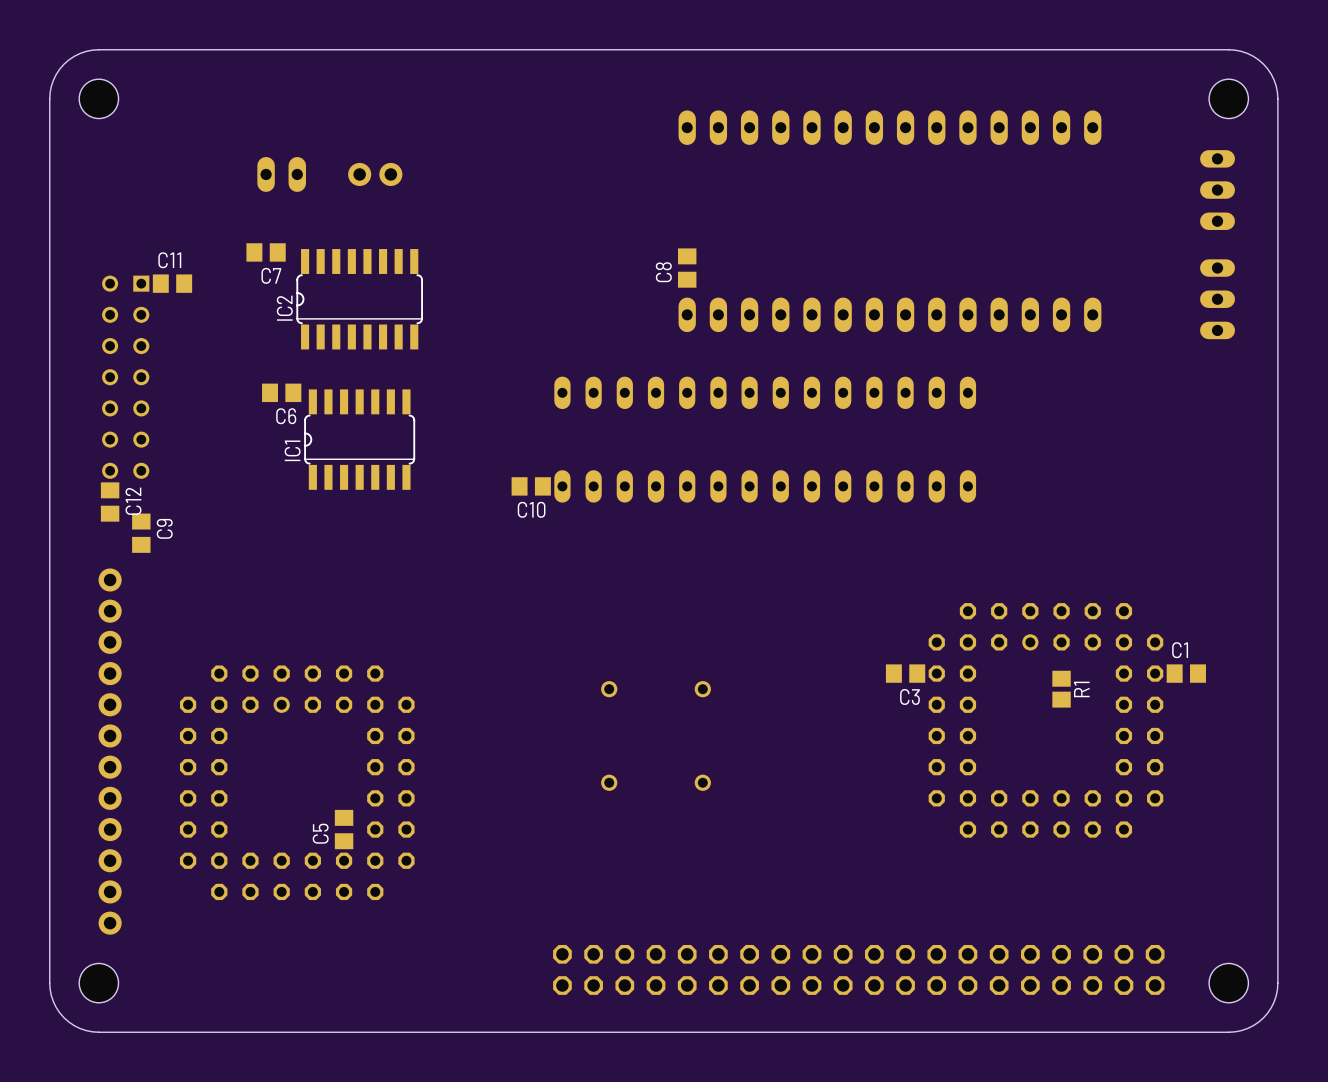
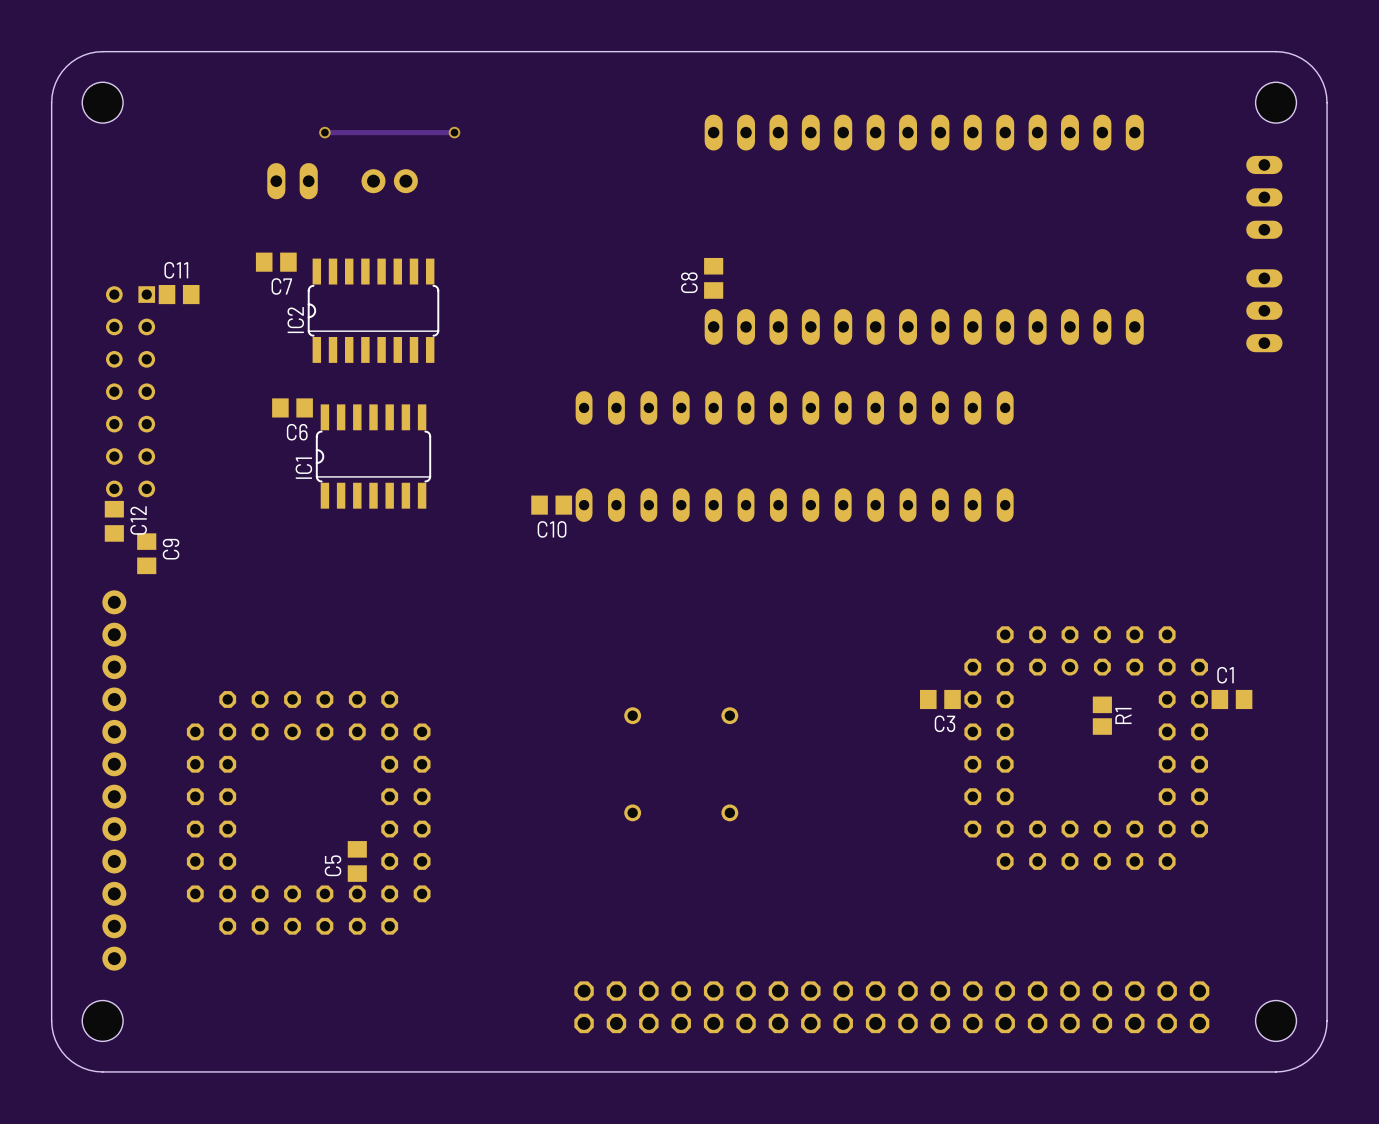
via: none -> (324, 132)
track: none -> (454, 132) (324, 132)
via: none -> (454, 132)

